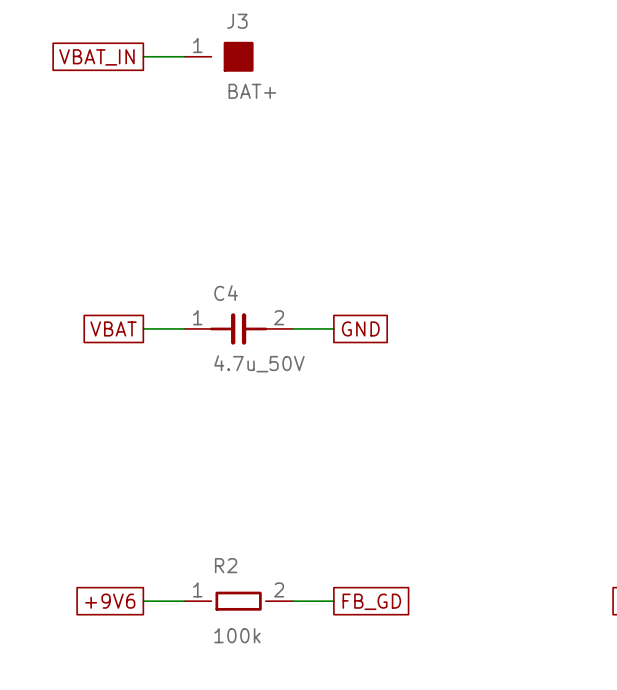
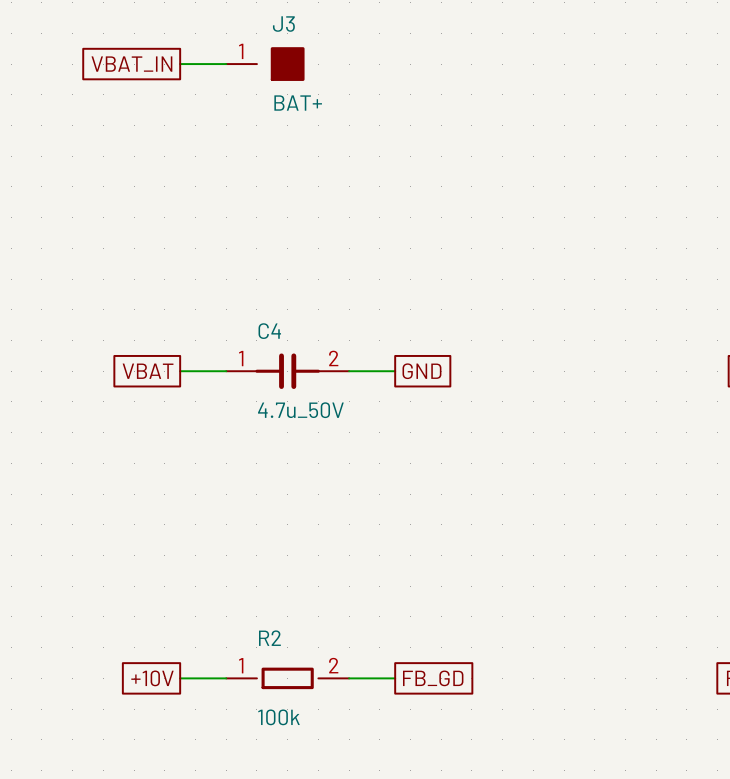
global label: +9V6 (110, 601) -> +10V (152, 678)

